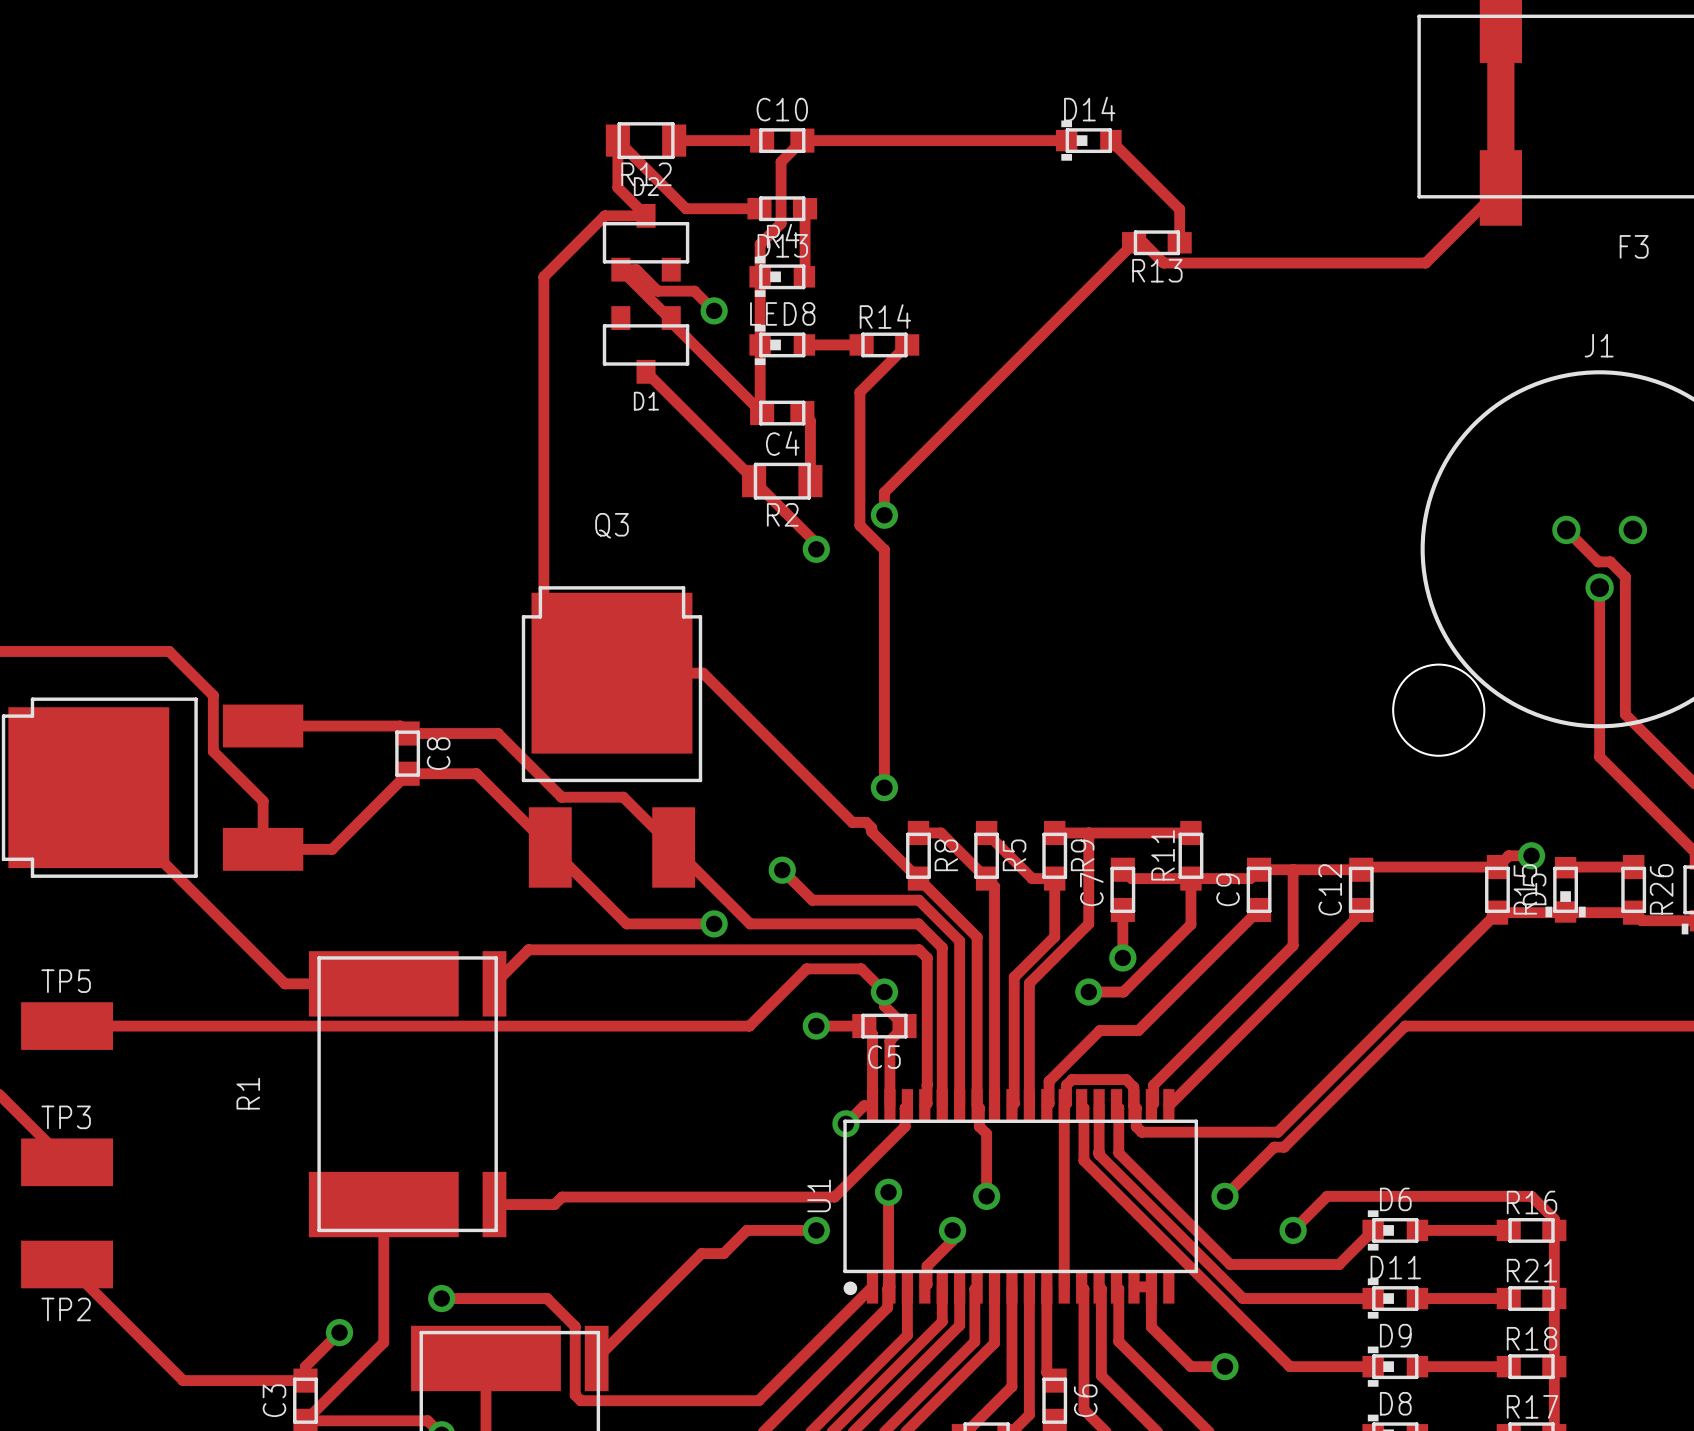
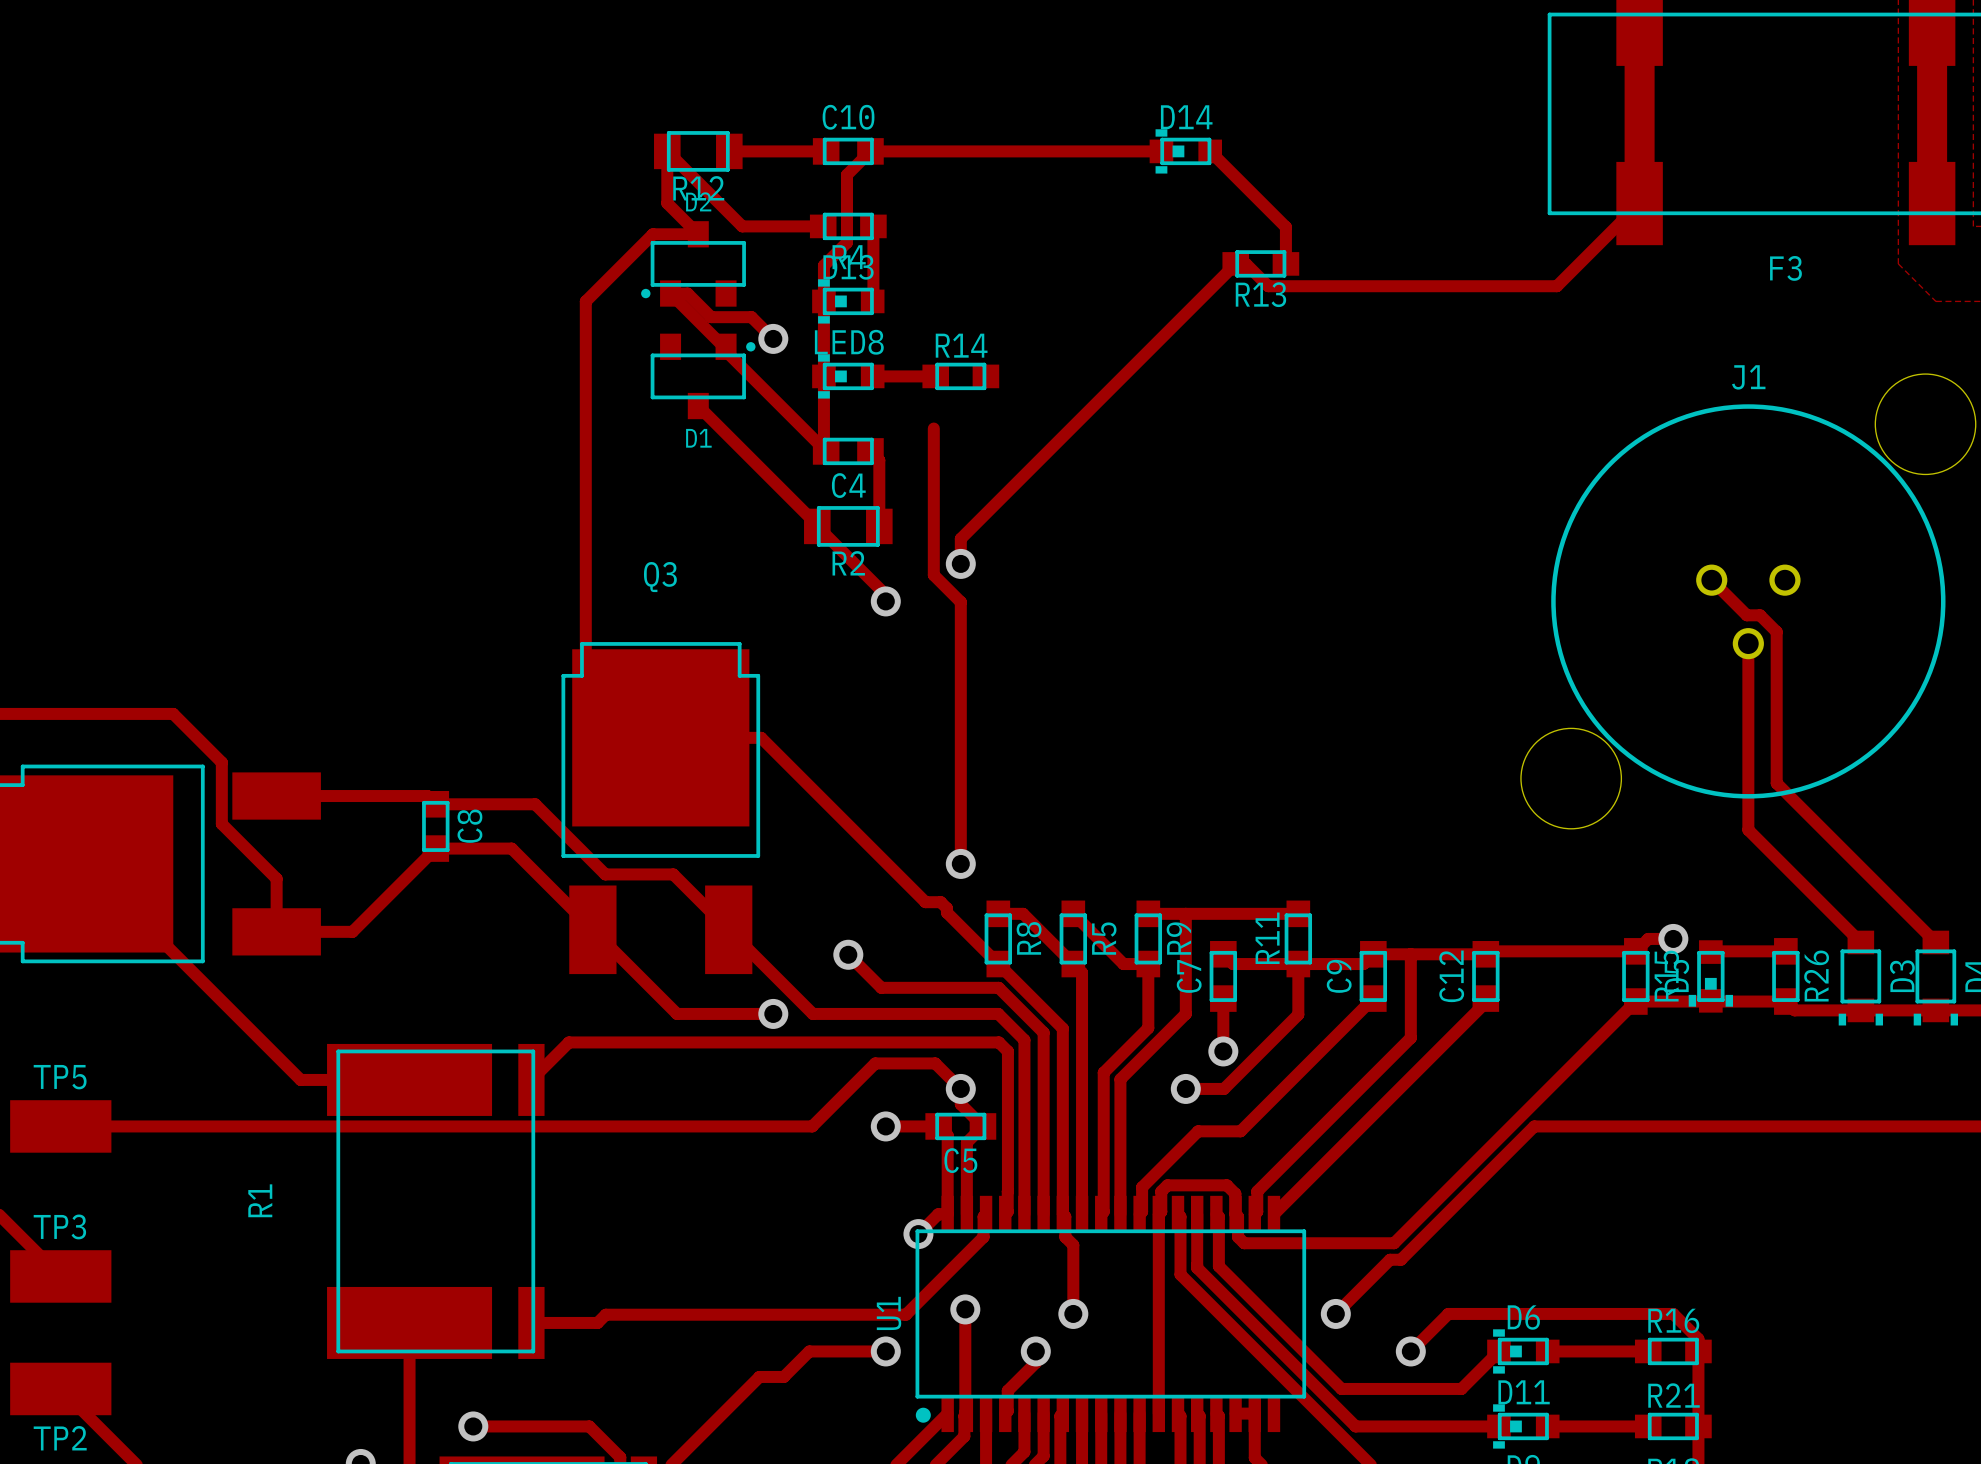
D2 footprint: [602, 203, 690, 282] -> [641, 221, 746, 307]
D1 footprint: [602, 306, 690, 384] -> [650, 333, 756, 420]
track: (907, 344) (859, 392) -> none

